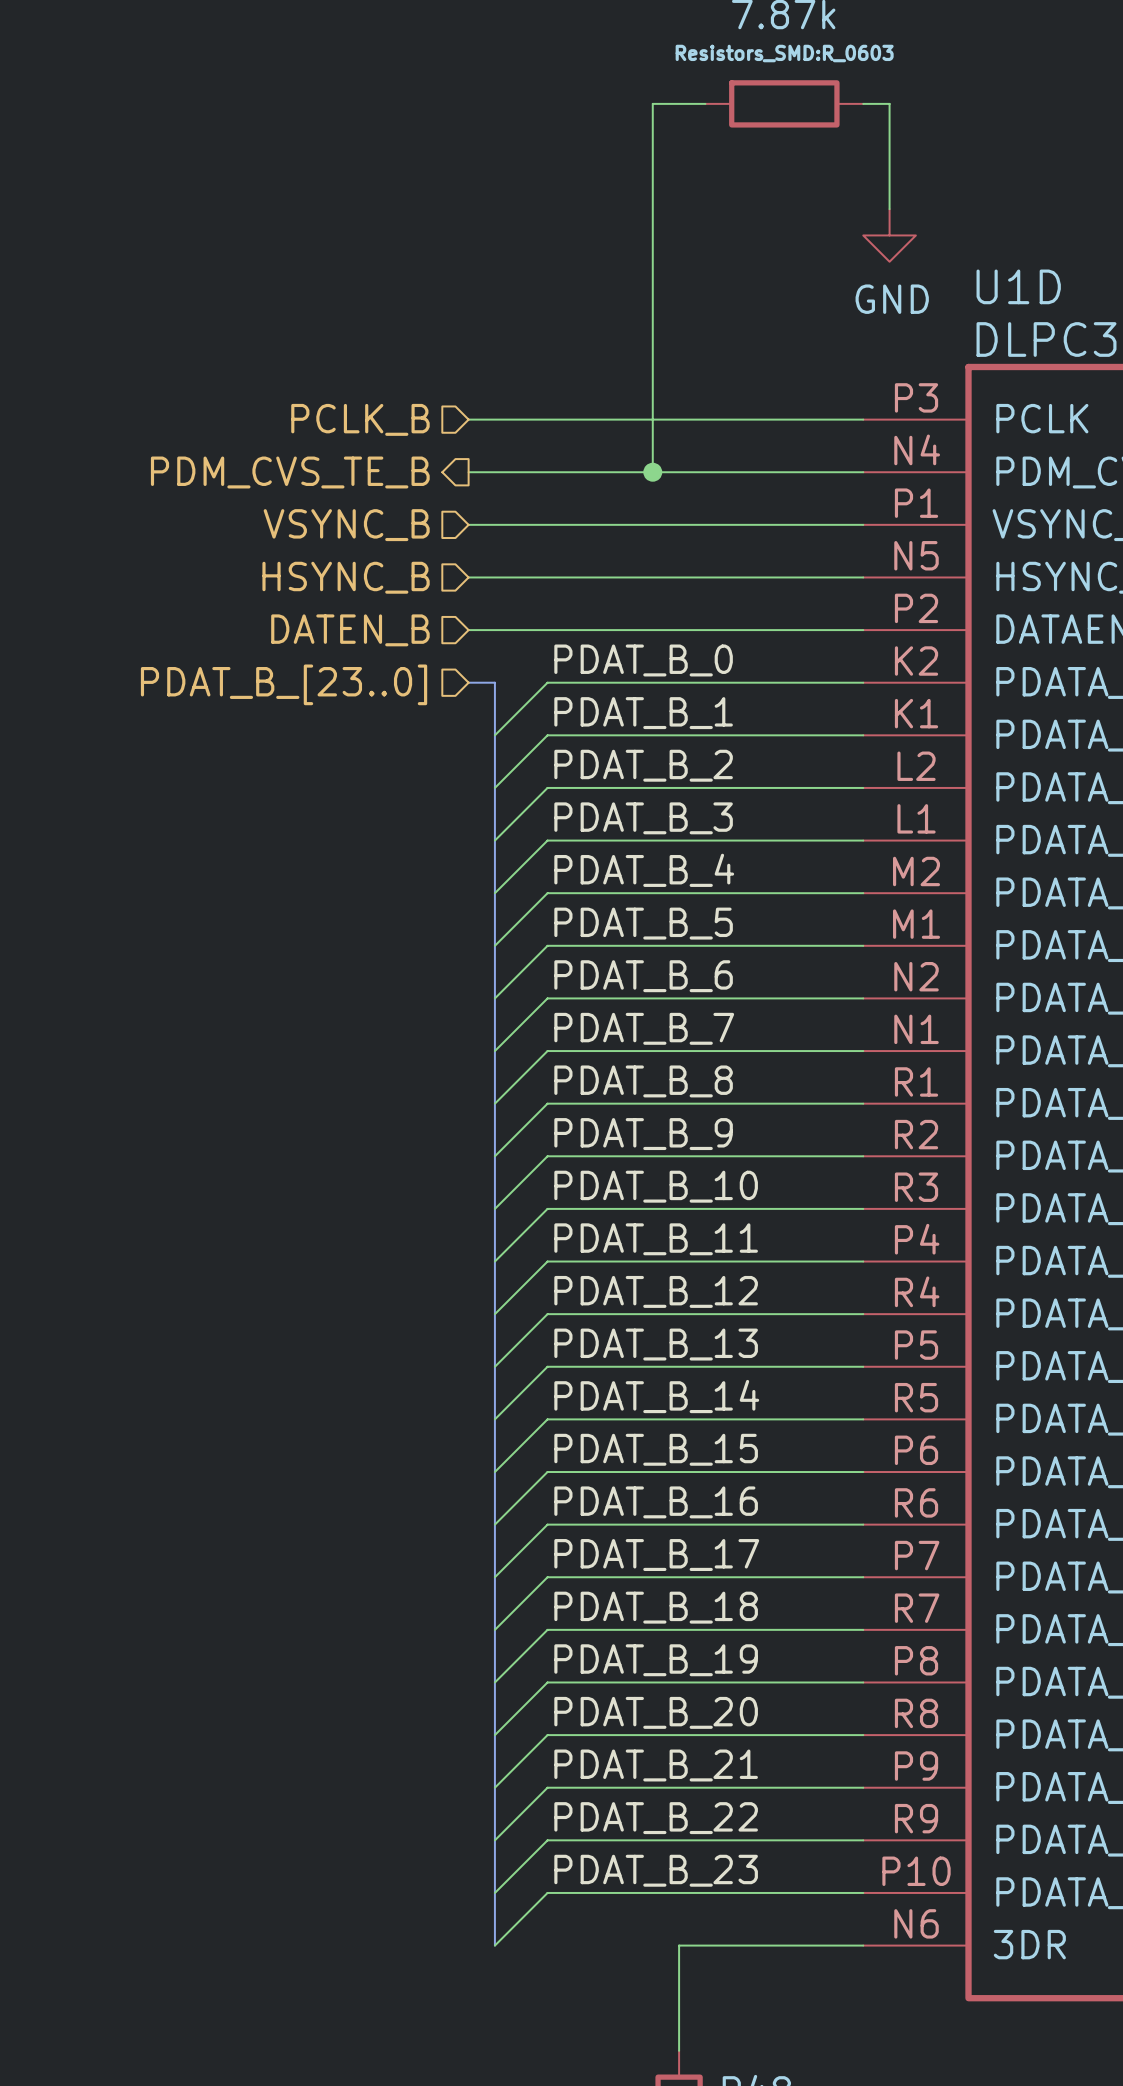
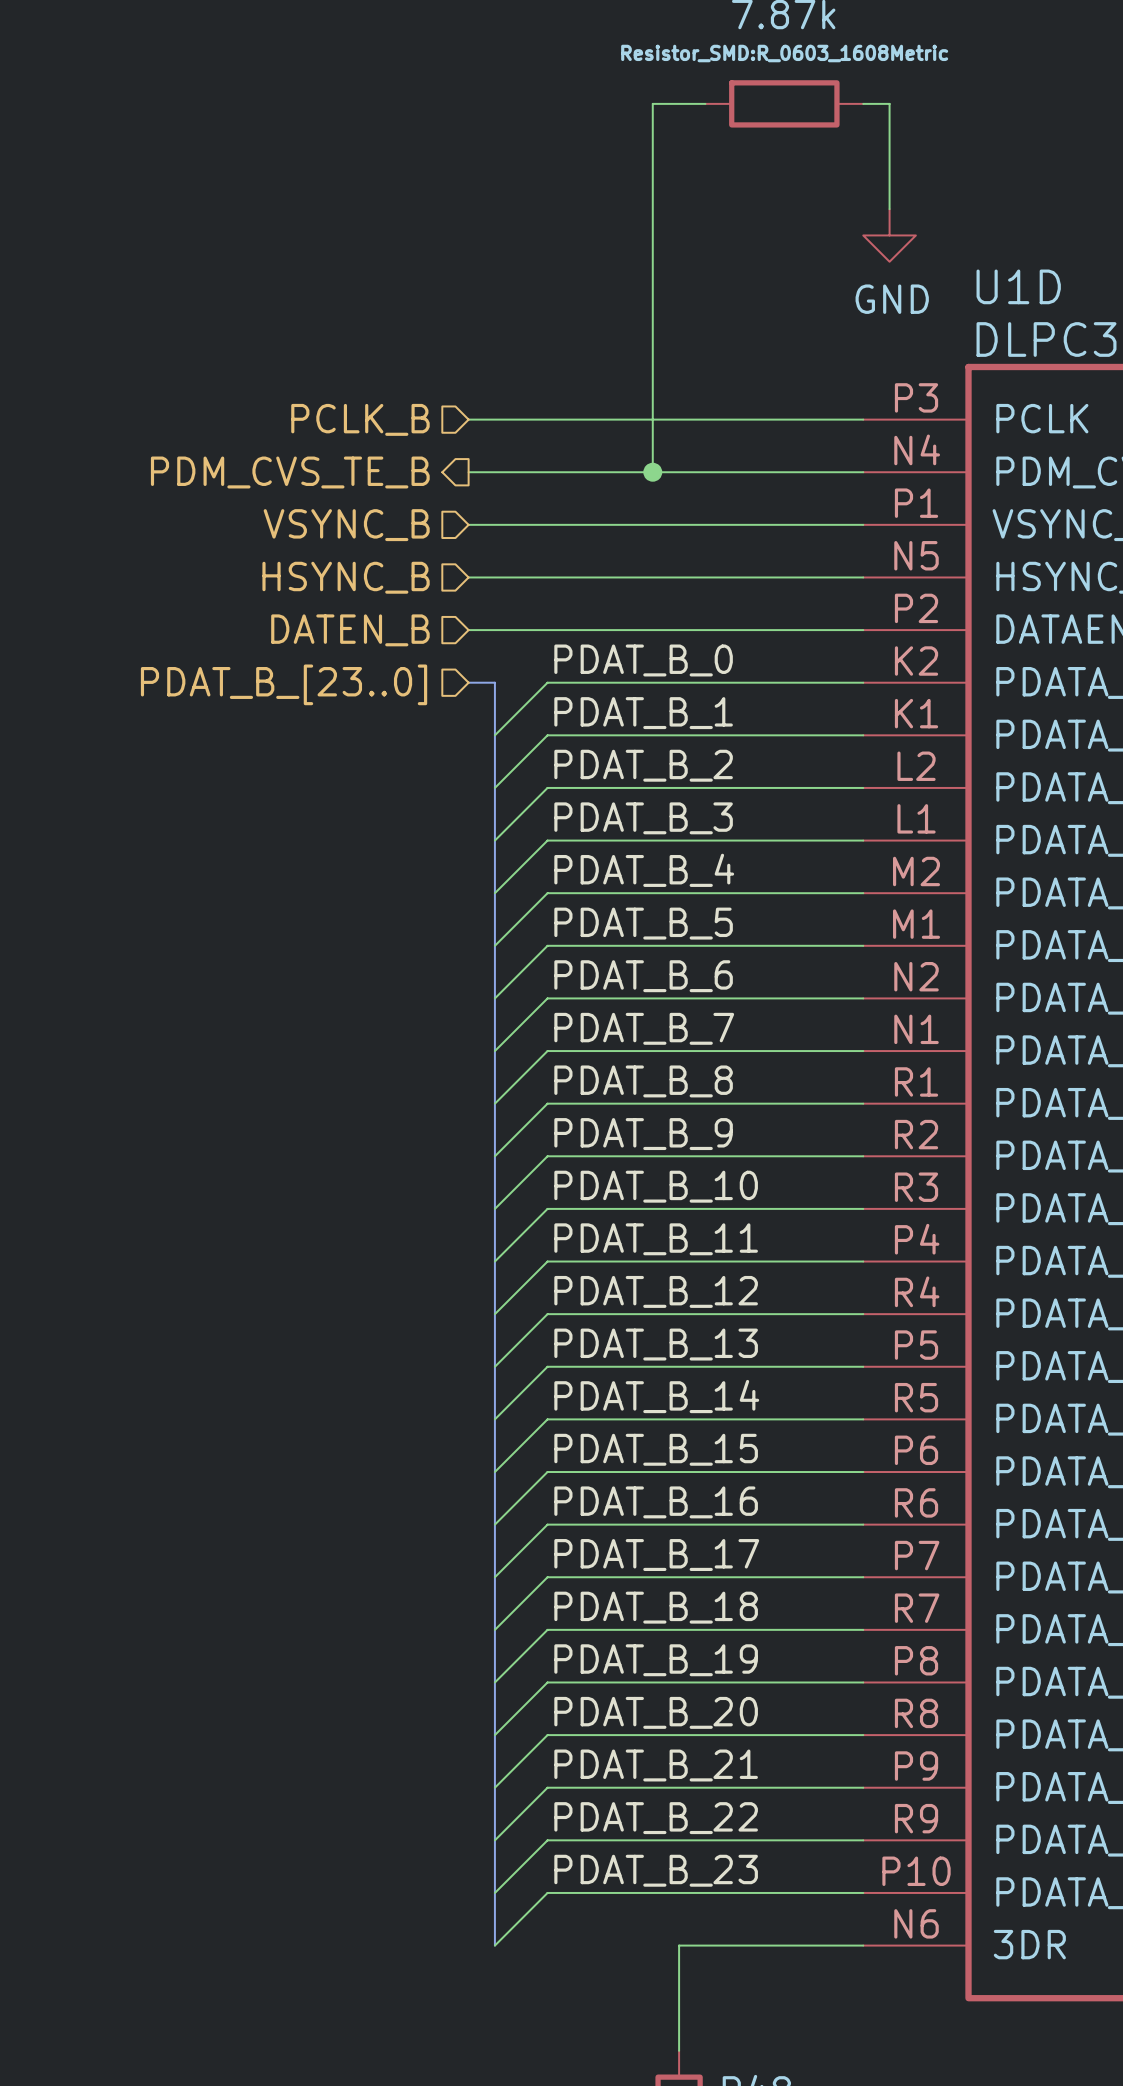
part text: Resistors_SMD:R_0603 (784, 53) -> Resistor_SMD:R_0603_1608Metric (784, 53)

